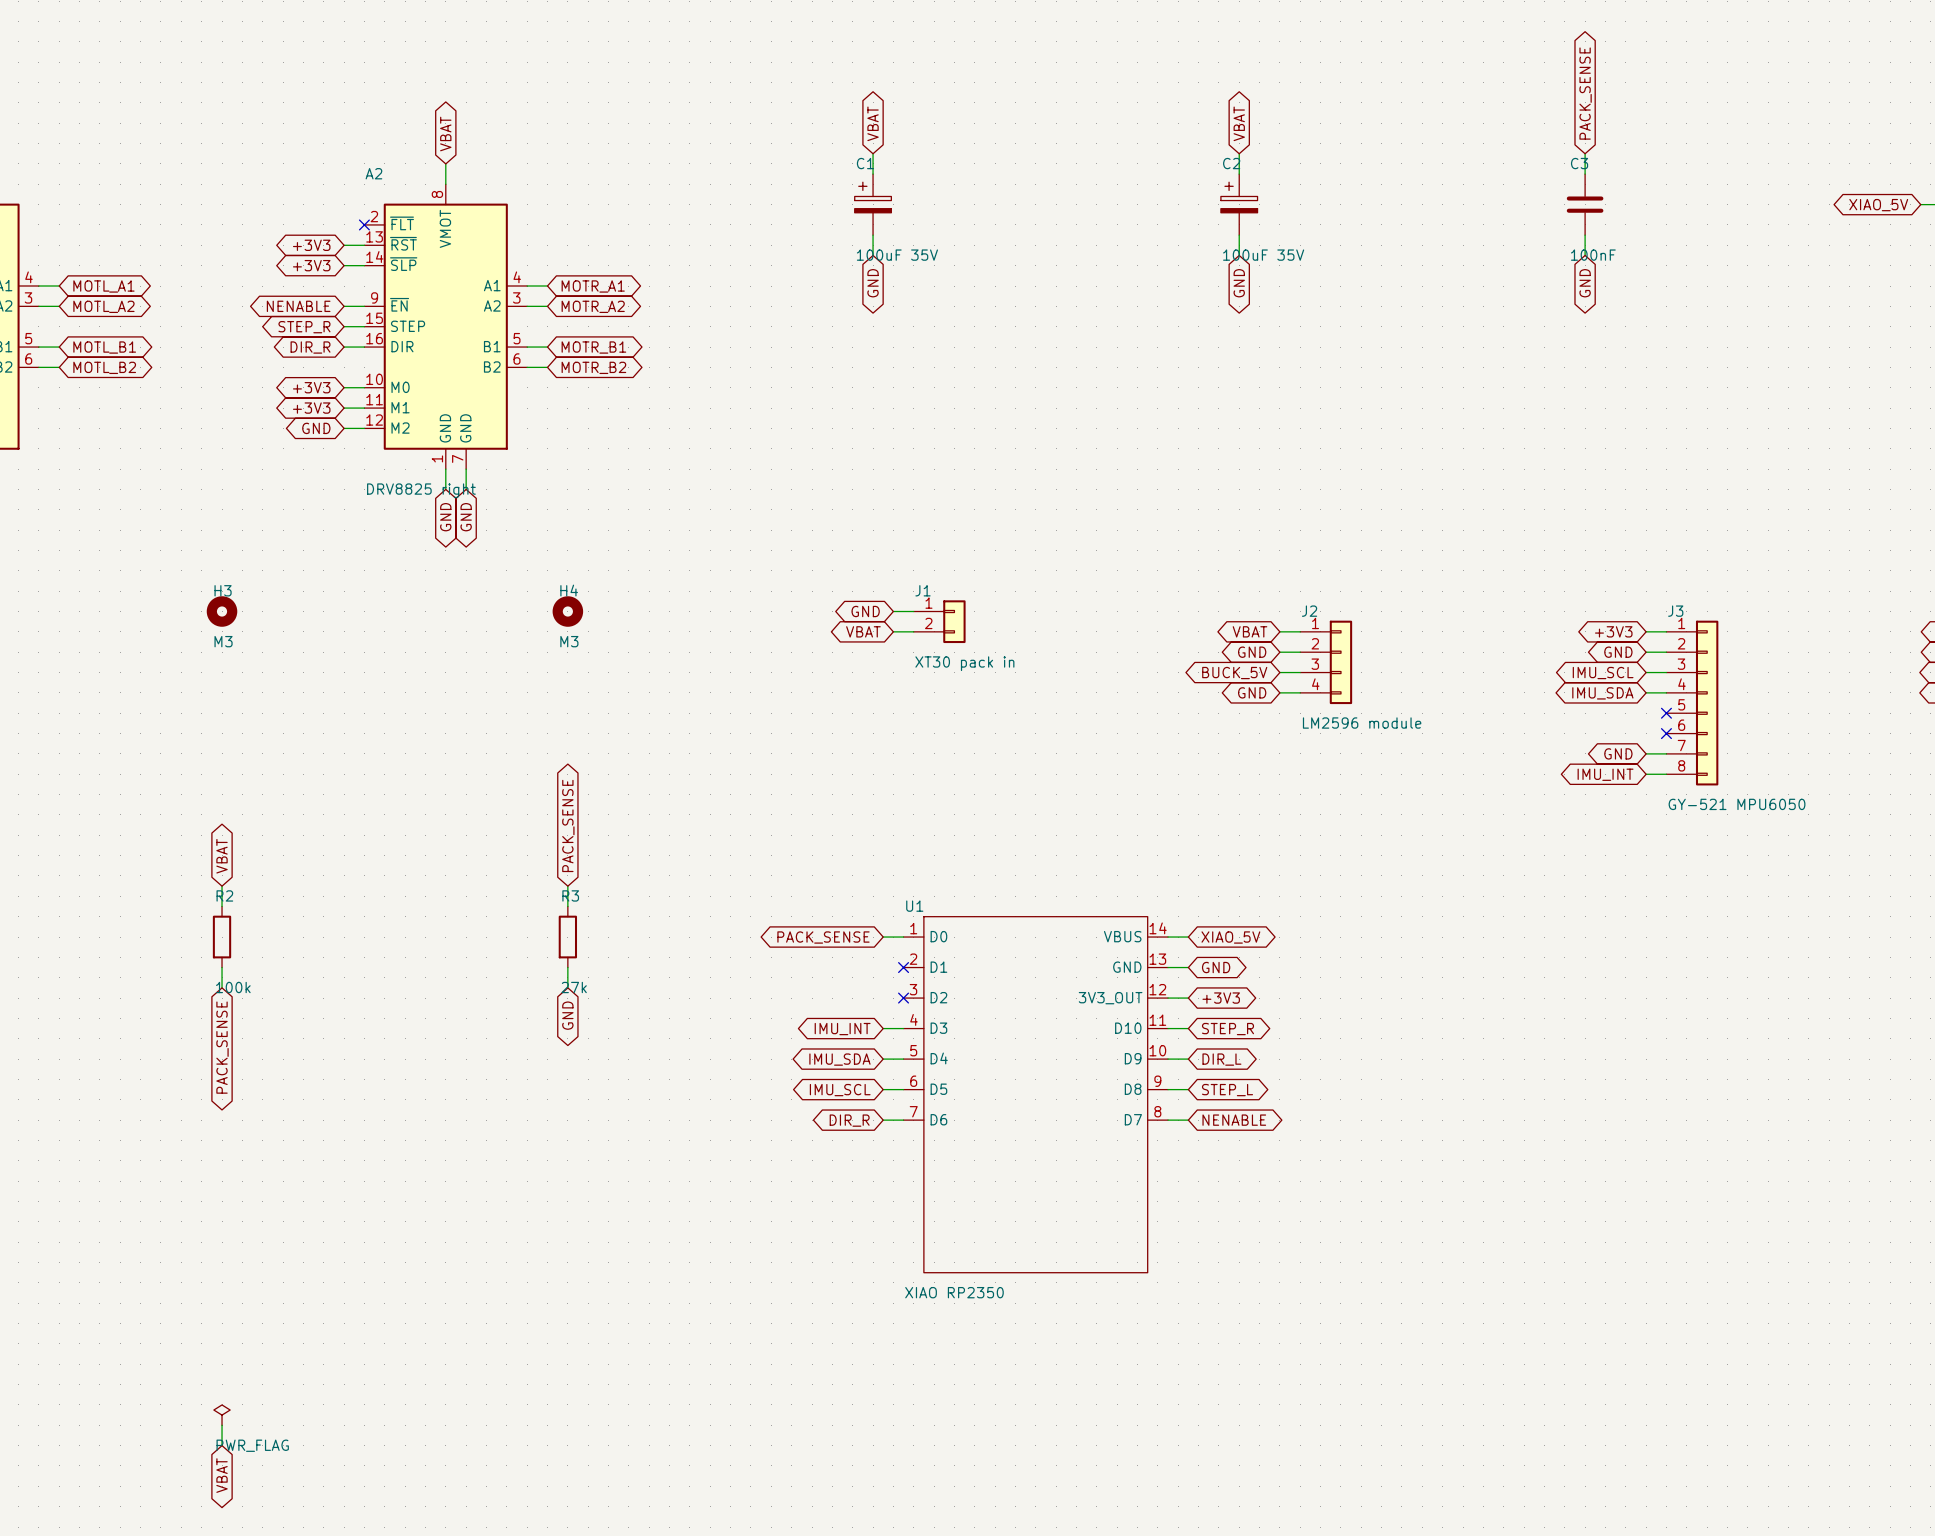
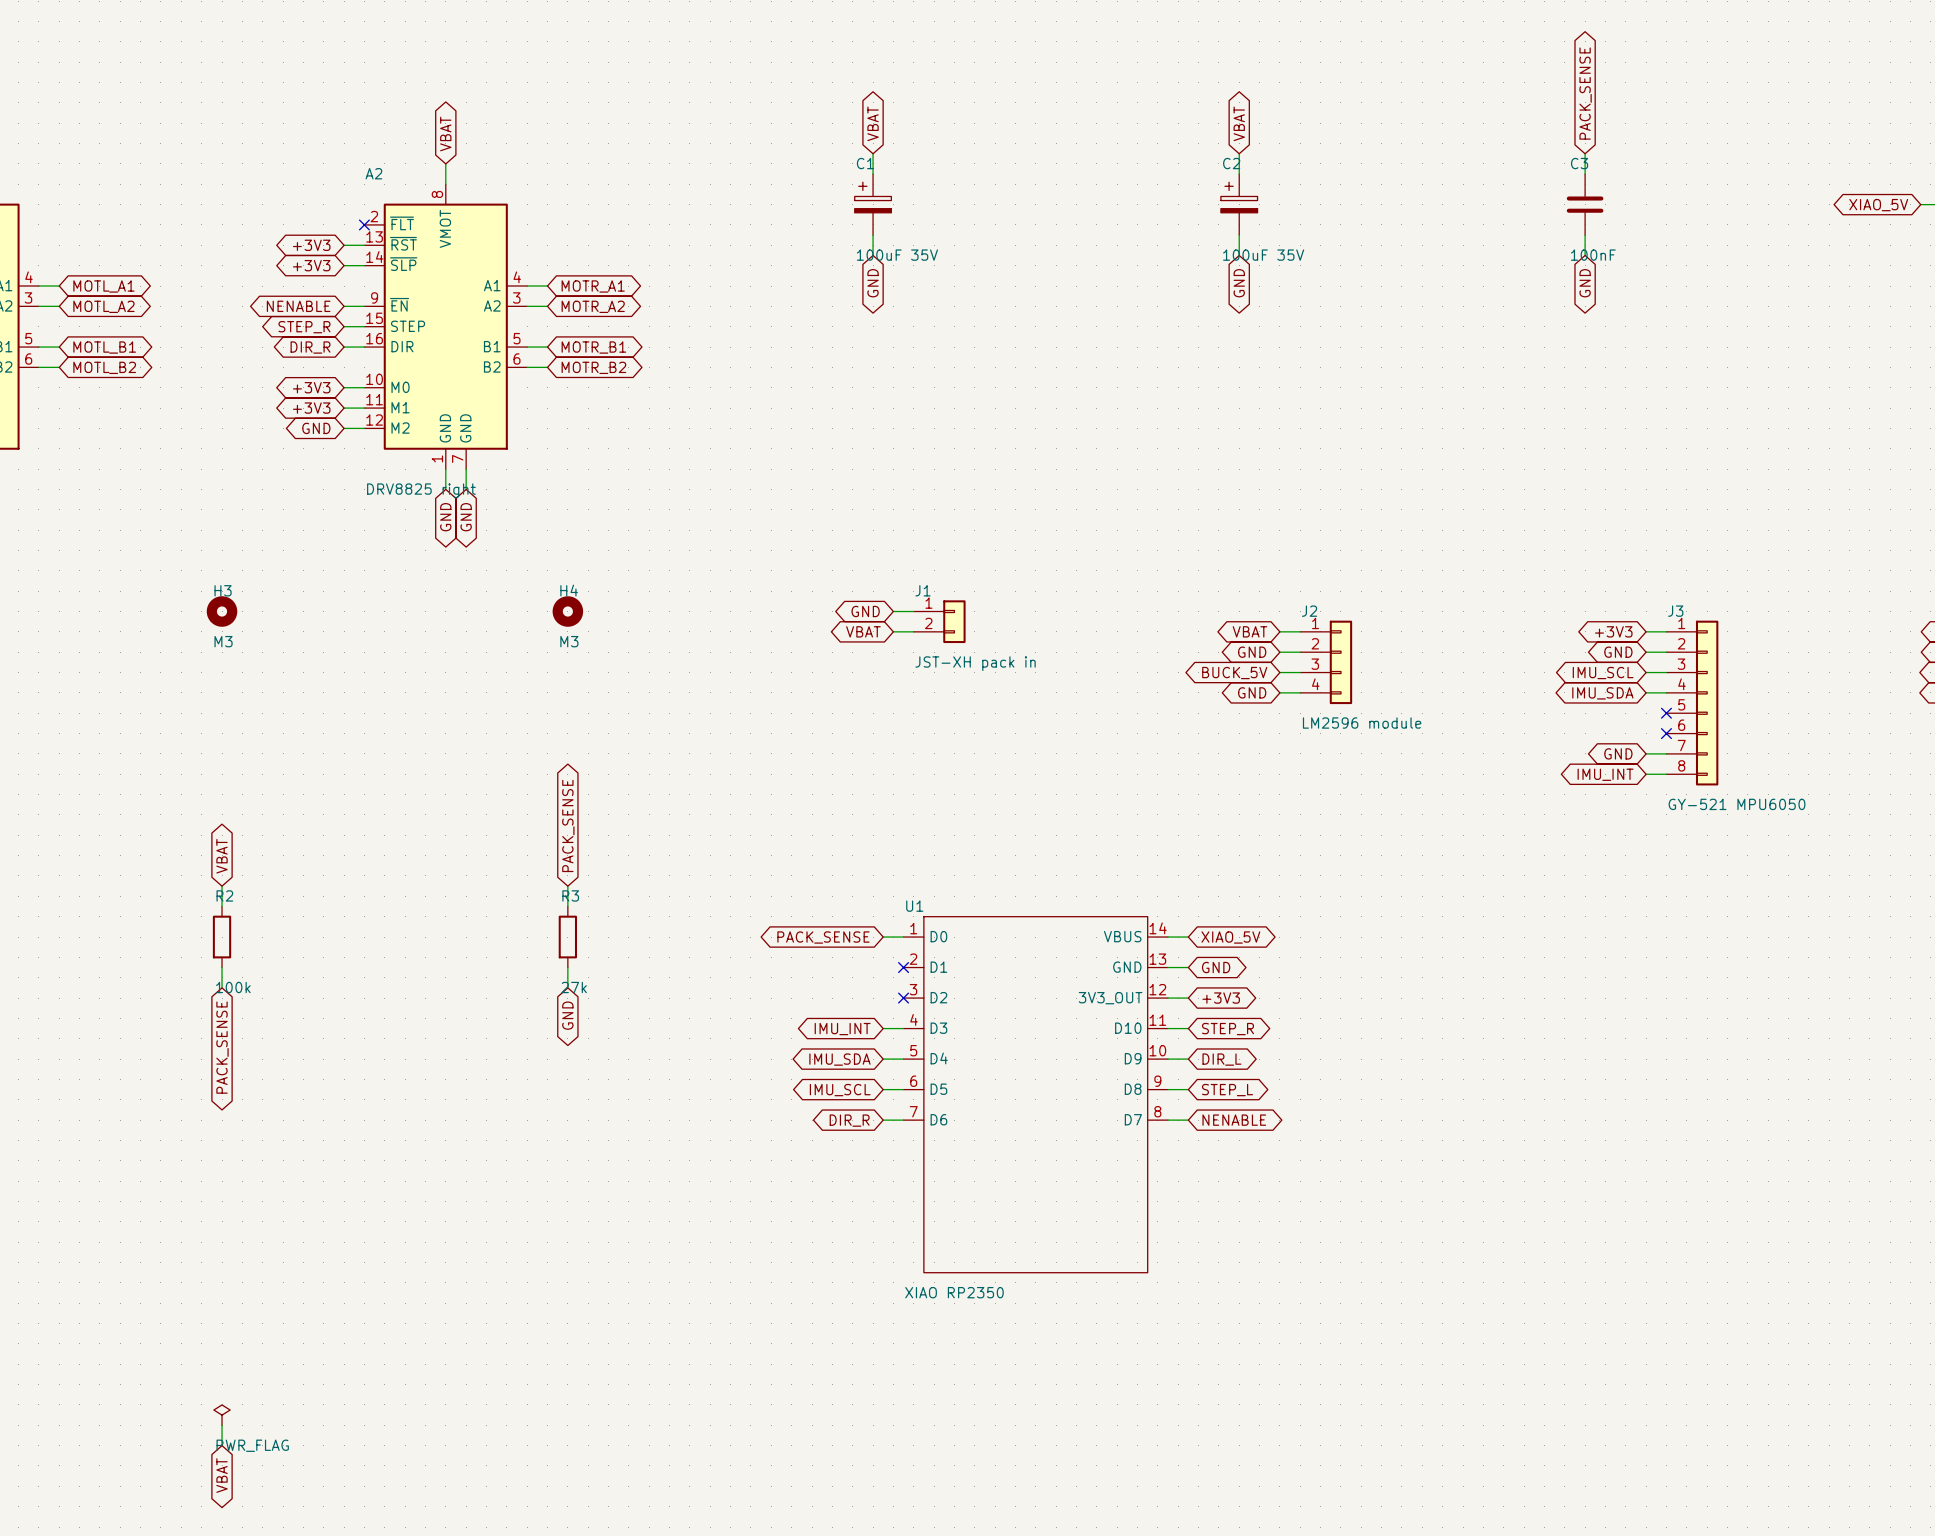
J1 value: XT30 pack in (964, 663) -> JST-XH pack in (975, 663)

